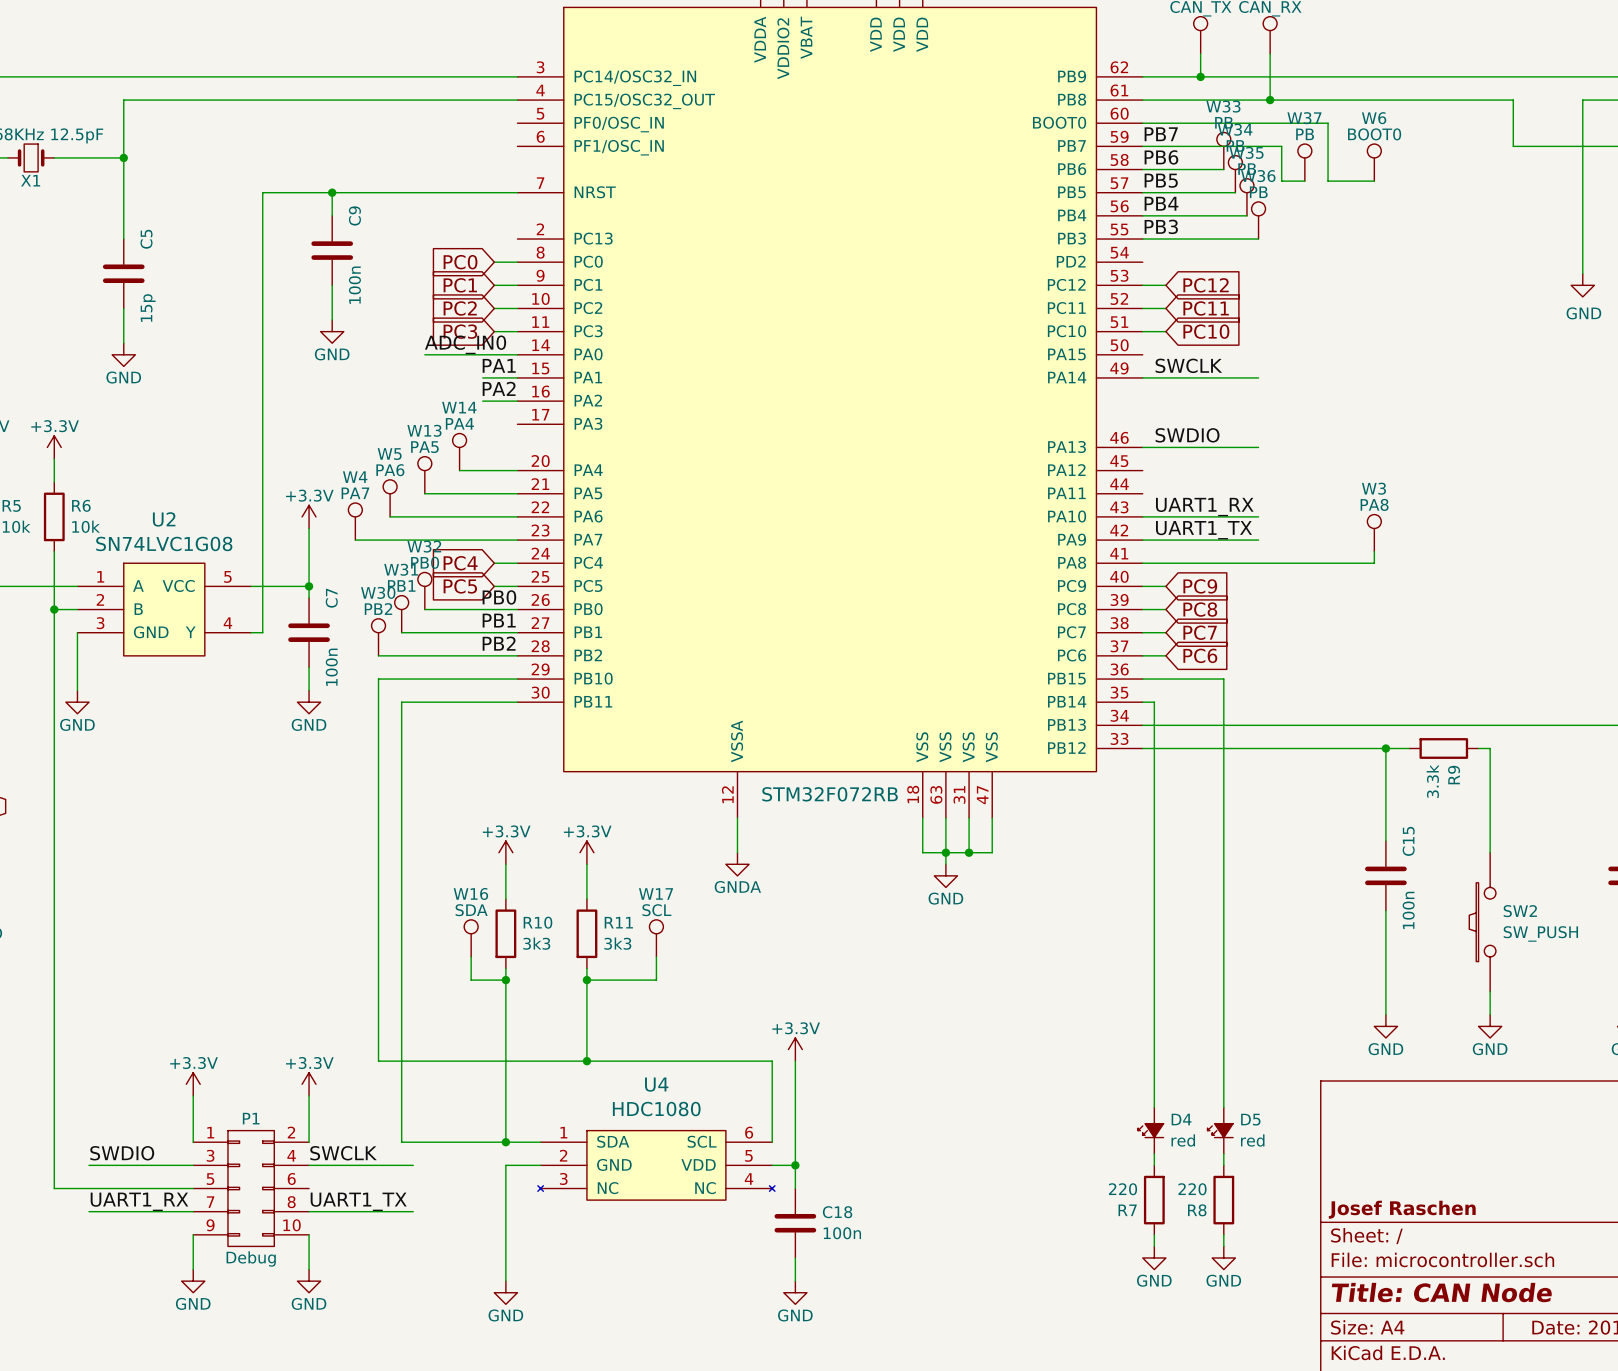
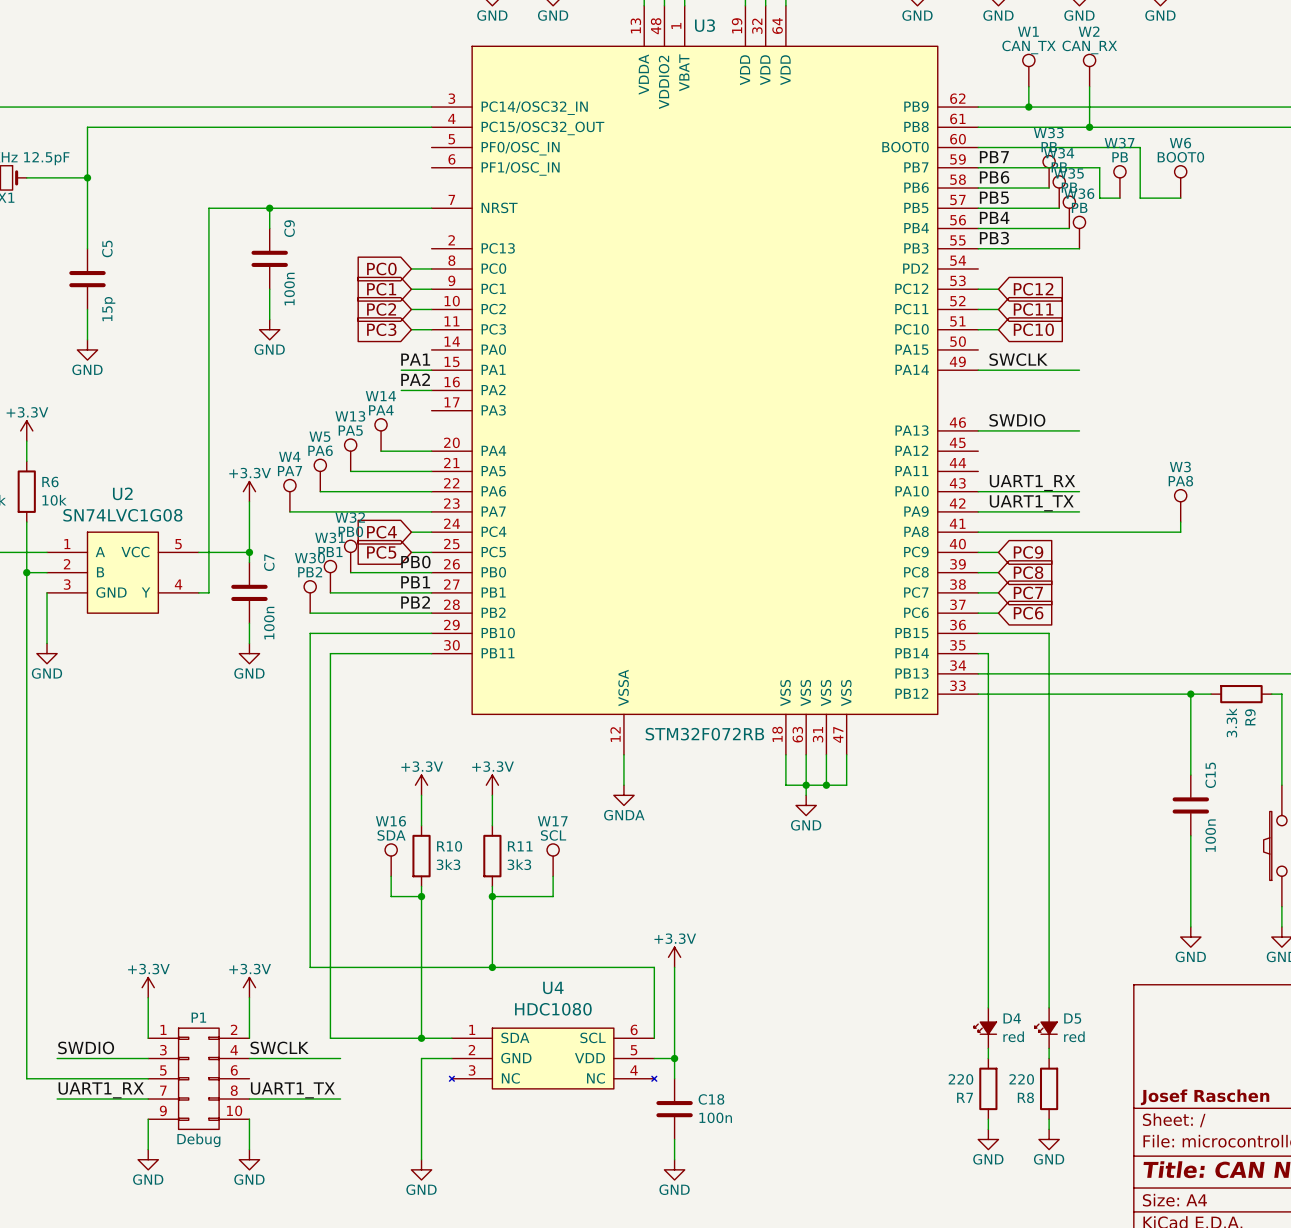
label: ADC_IN0 (465, 344) -> none
wire: (424, 354) (517, 354) -> none

